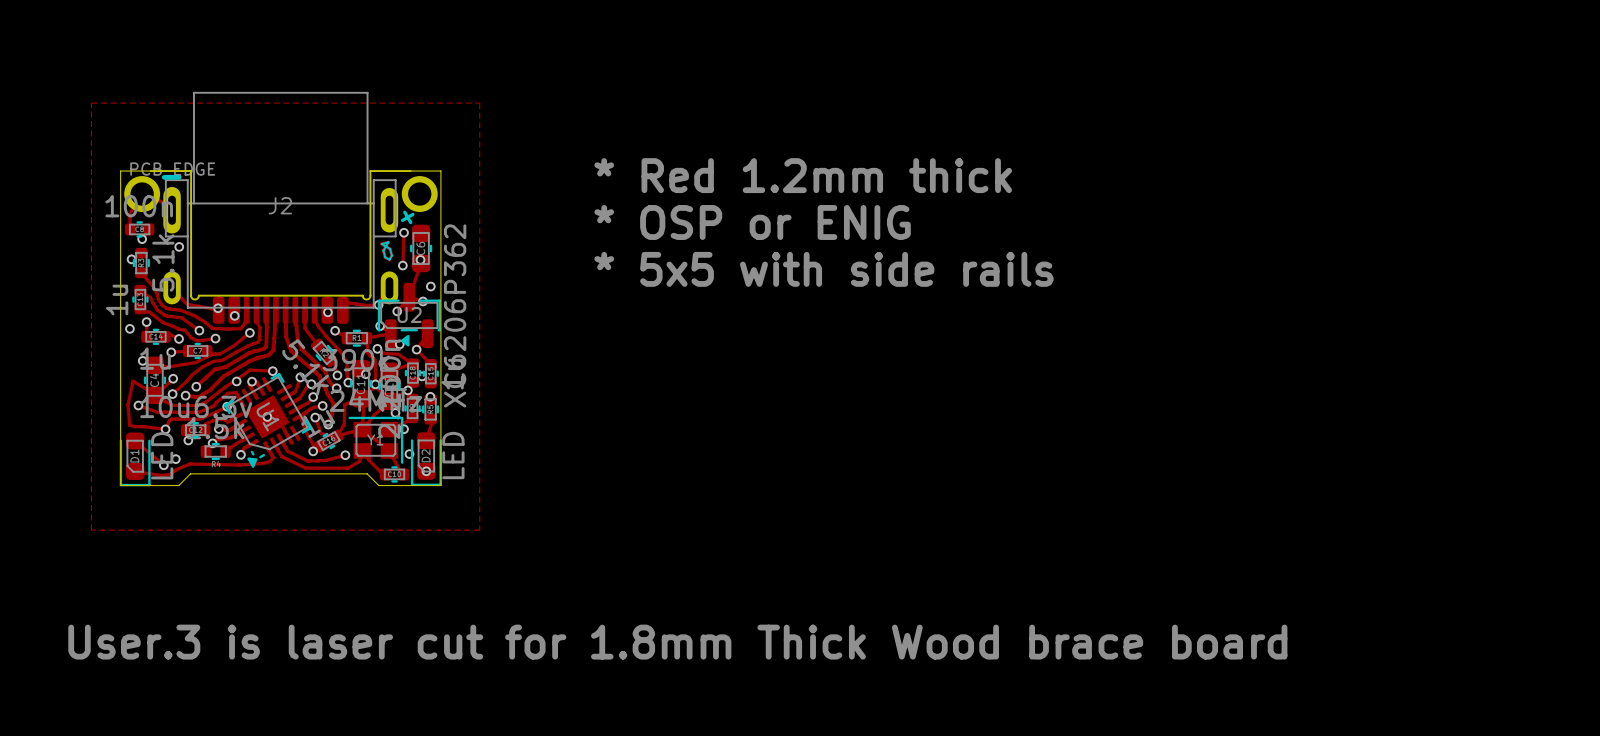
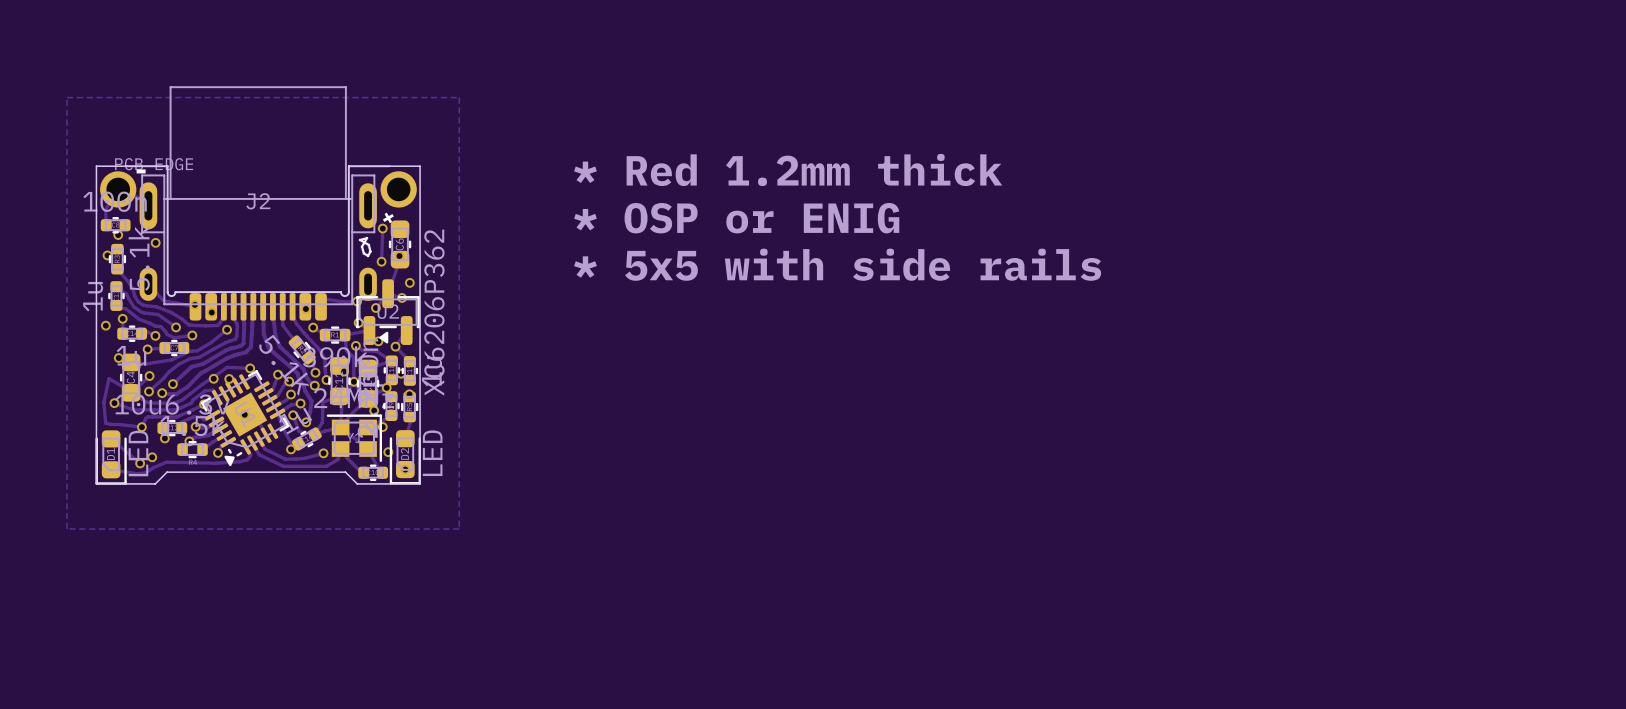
text: User.3 is laser cut for 1.8mm Thick Wood brace board (677, 642) -> none

